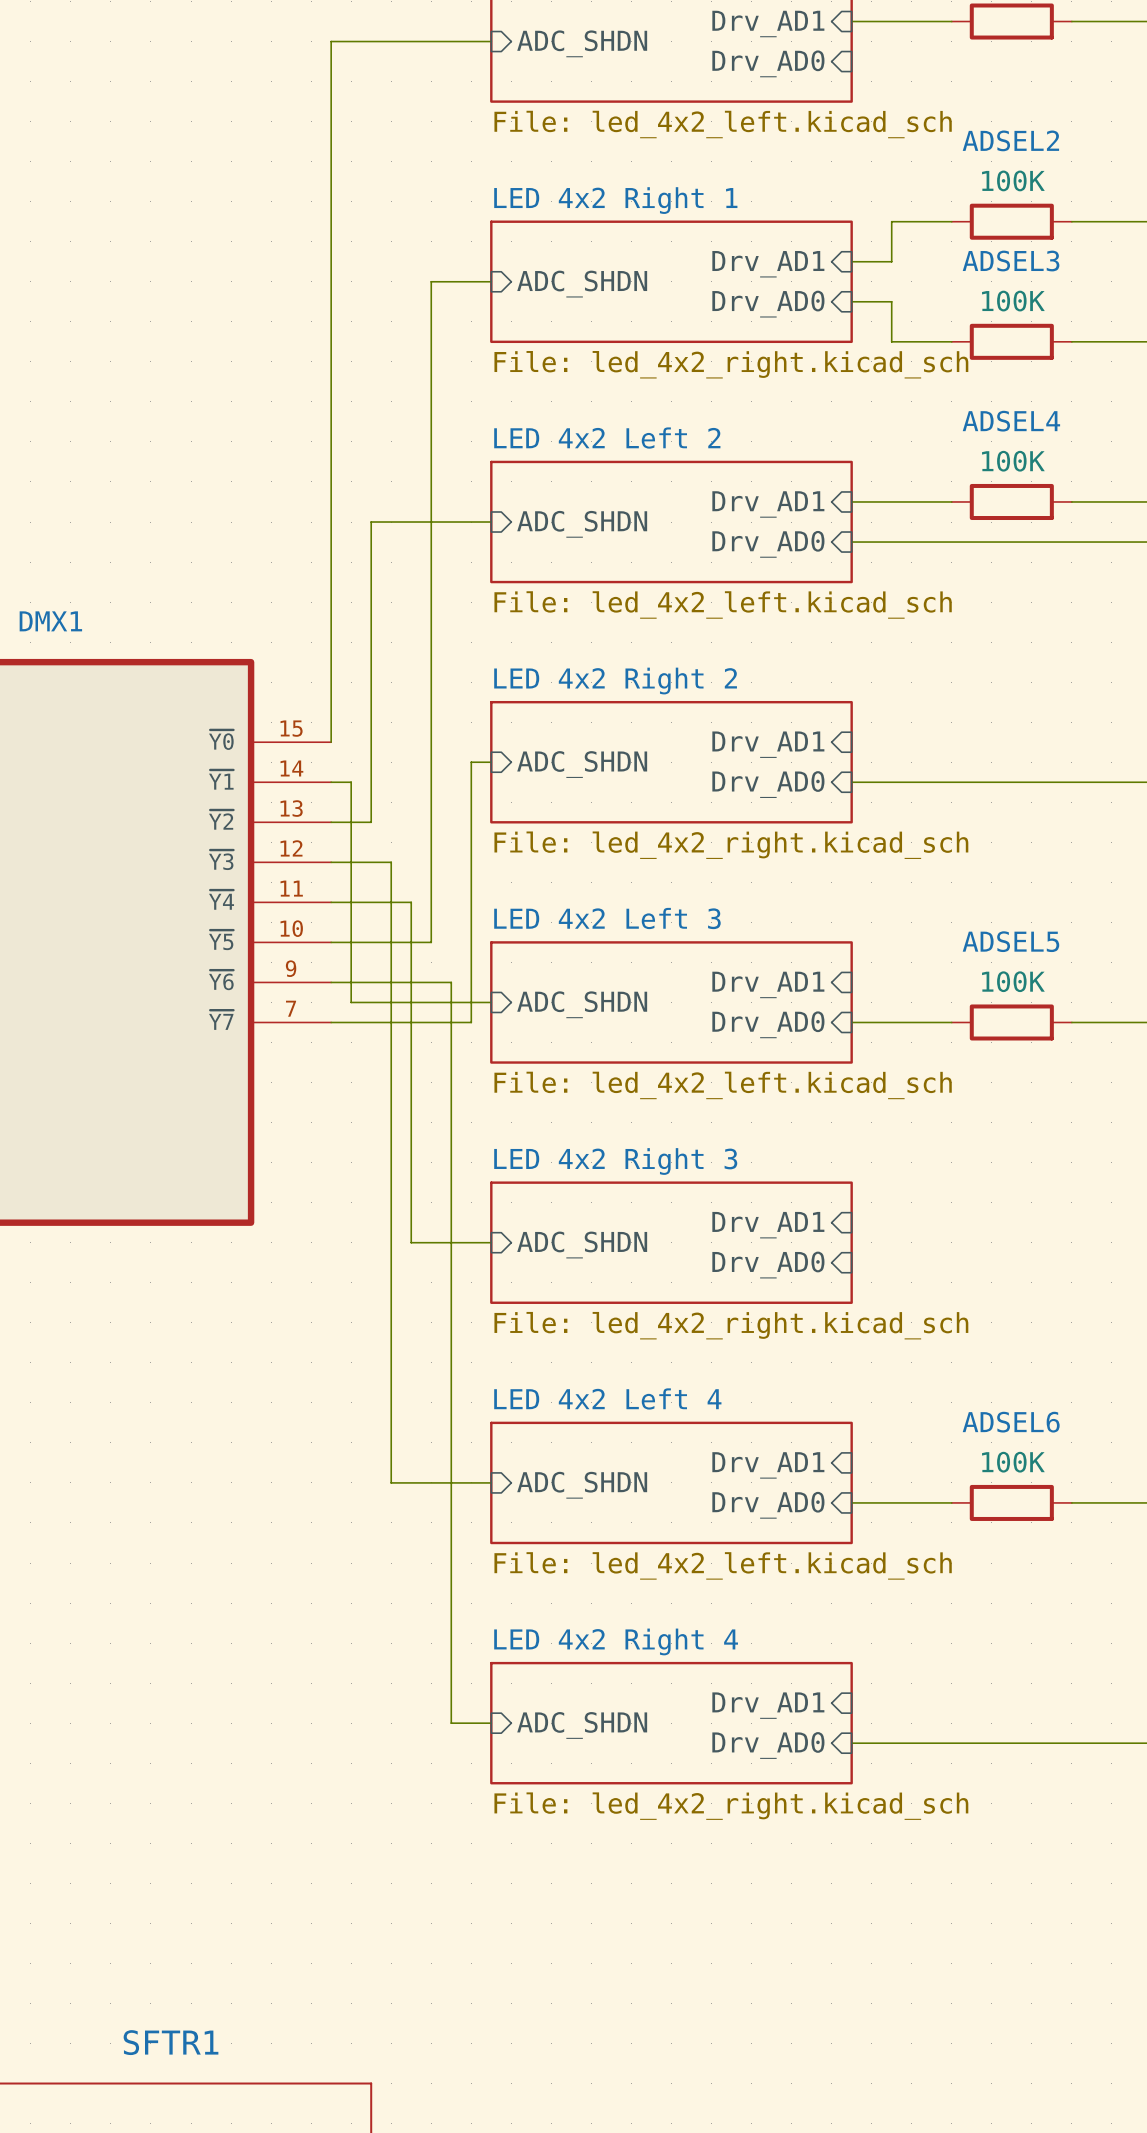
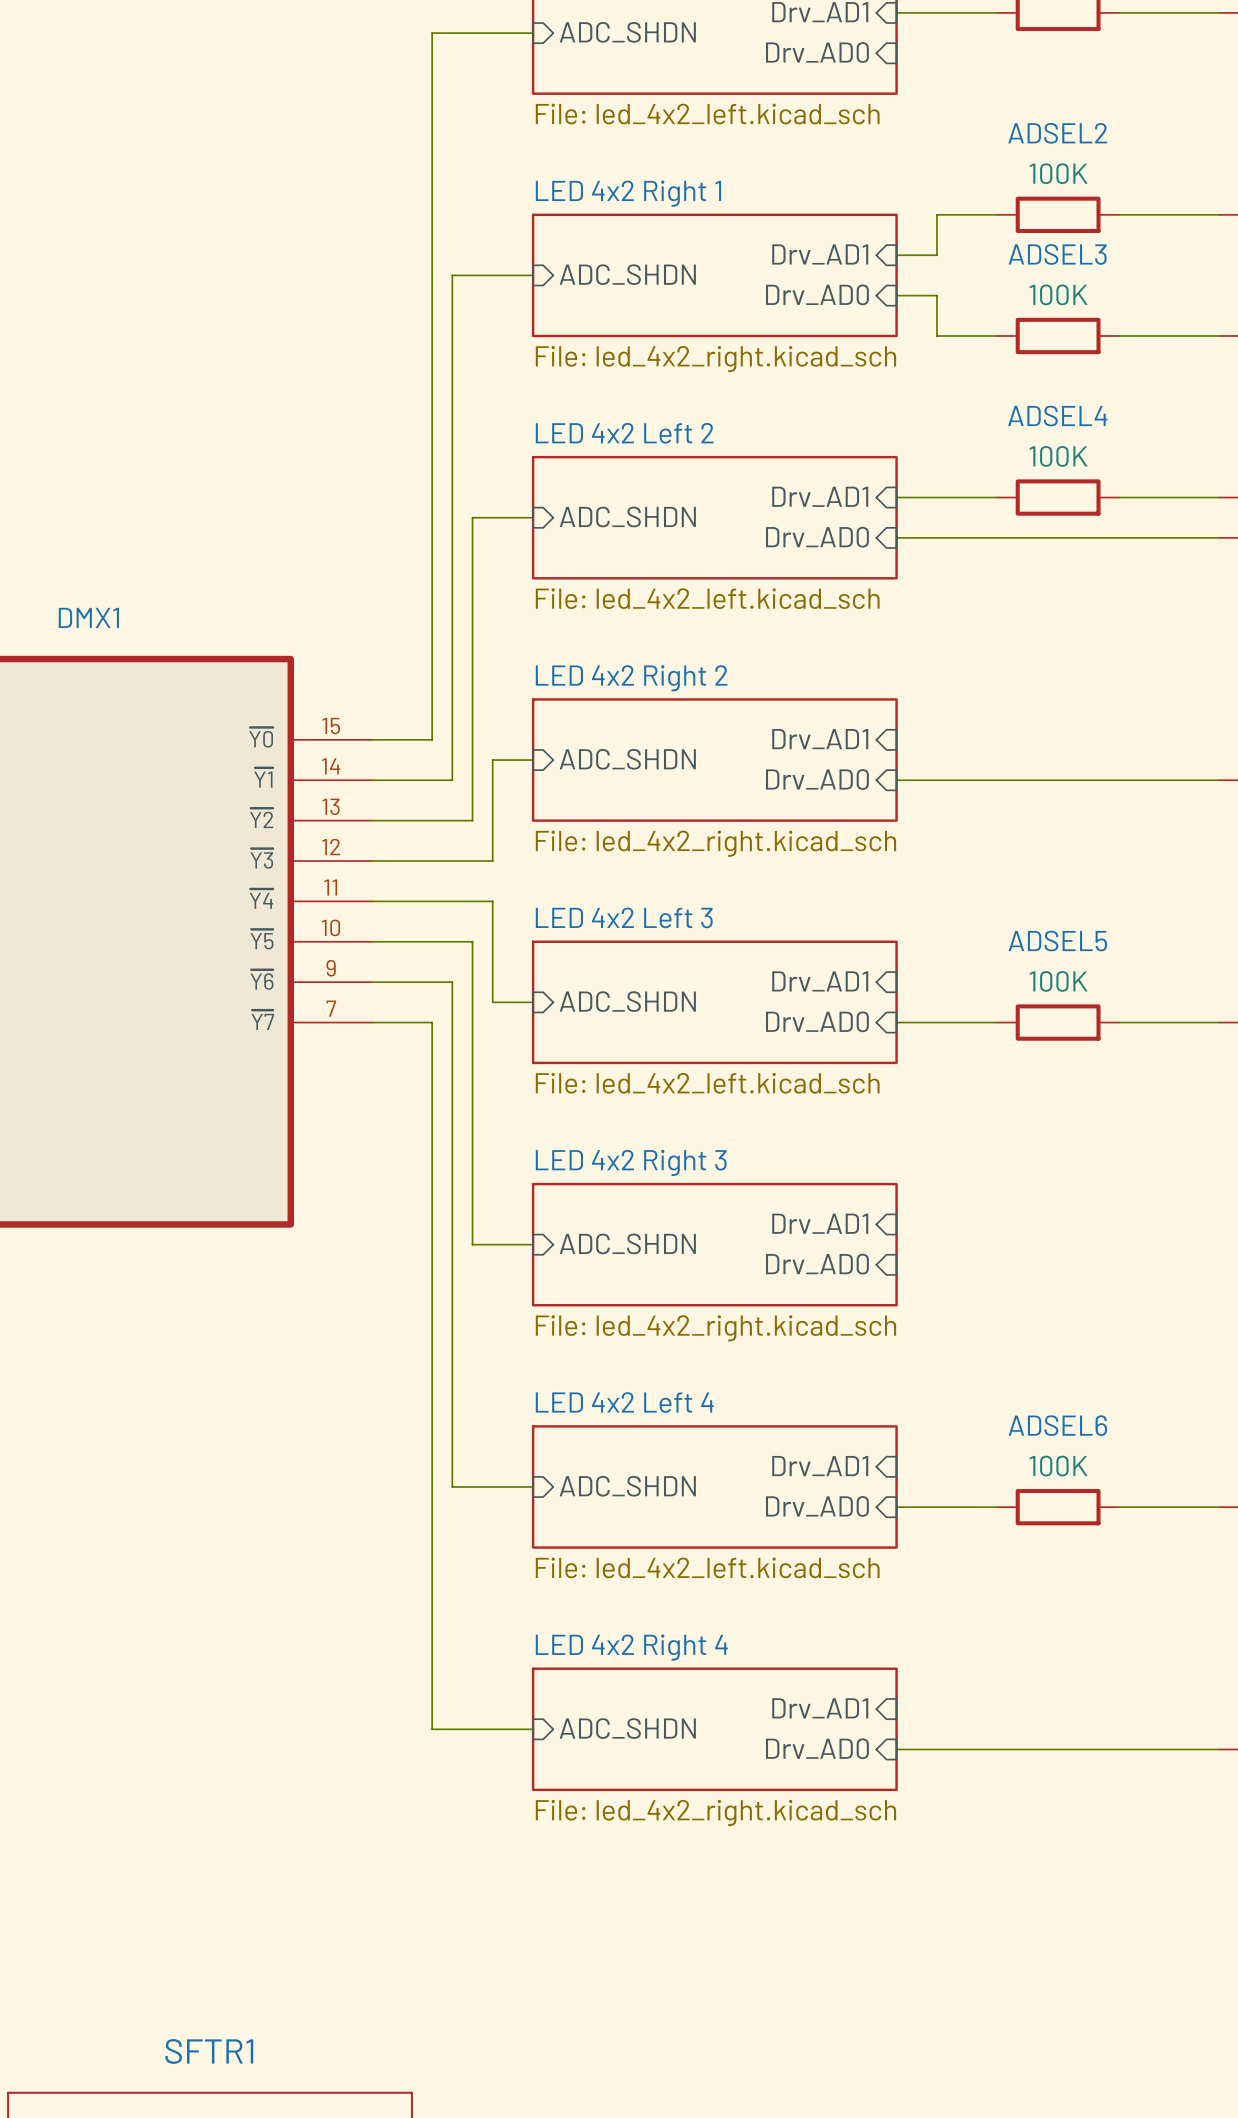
wire: (391, 41) (331, 41) (331, 742) -> (432, 33) (432, 739) (371, 739)
wire: (431, 281) (431, 522) (371, 522) (371, 822) -> (472, 275) (452, 275) (452, 780) (391, 780)
wire: (471, 762) (471, 1022) (391, 1022) (391, 862) -> (512, 760) (492, 760) (492, 861) (432, 861)
wire: (351, 782) (351, 1002) (451, 1002) (451, 1723) -> none
wire: (431, 822) (431, 942) -> (472, 820) (411, 820)
wire: (411, 902) (411, 982) (451, 982) -> (452, 901) (492, 901) (492, 982)
wire: none -> (472, 941) (472, 1244)
wire: (411, 1242) (431, 1242) -> (452, 1244) (452, 1486)
wire: (391, 1482) (411, 1482) -> (432, 1486) (432, 1729) (492, 1729)

